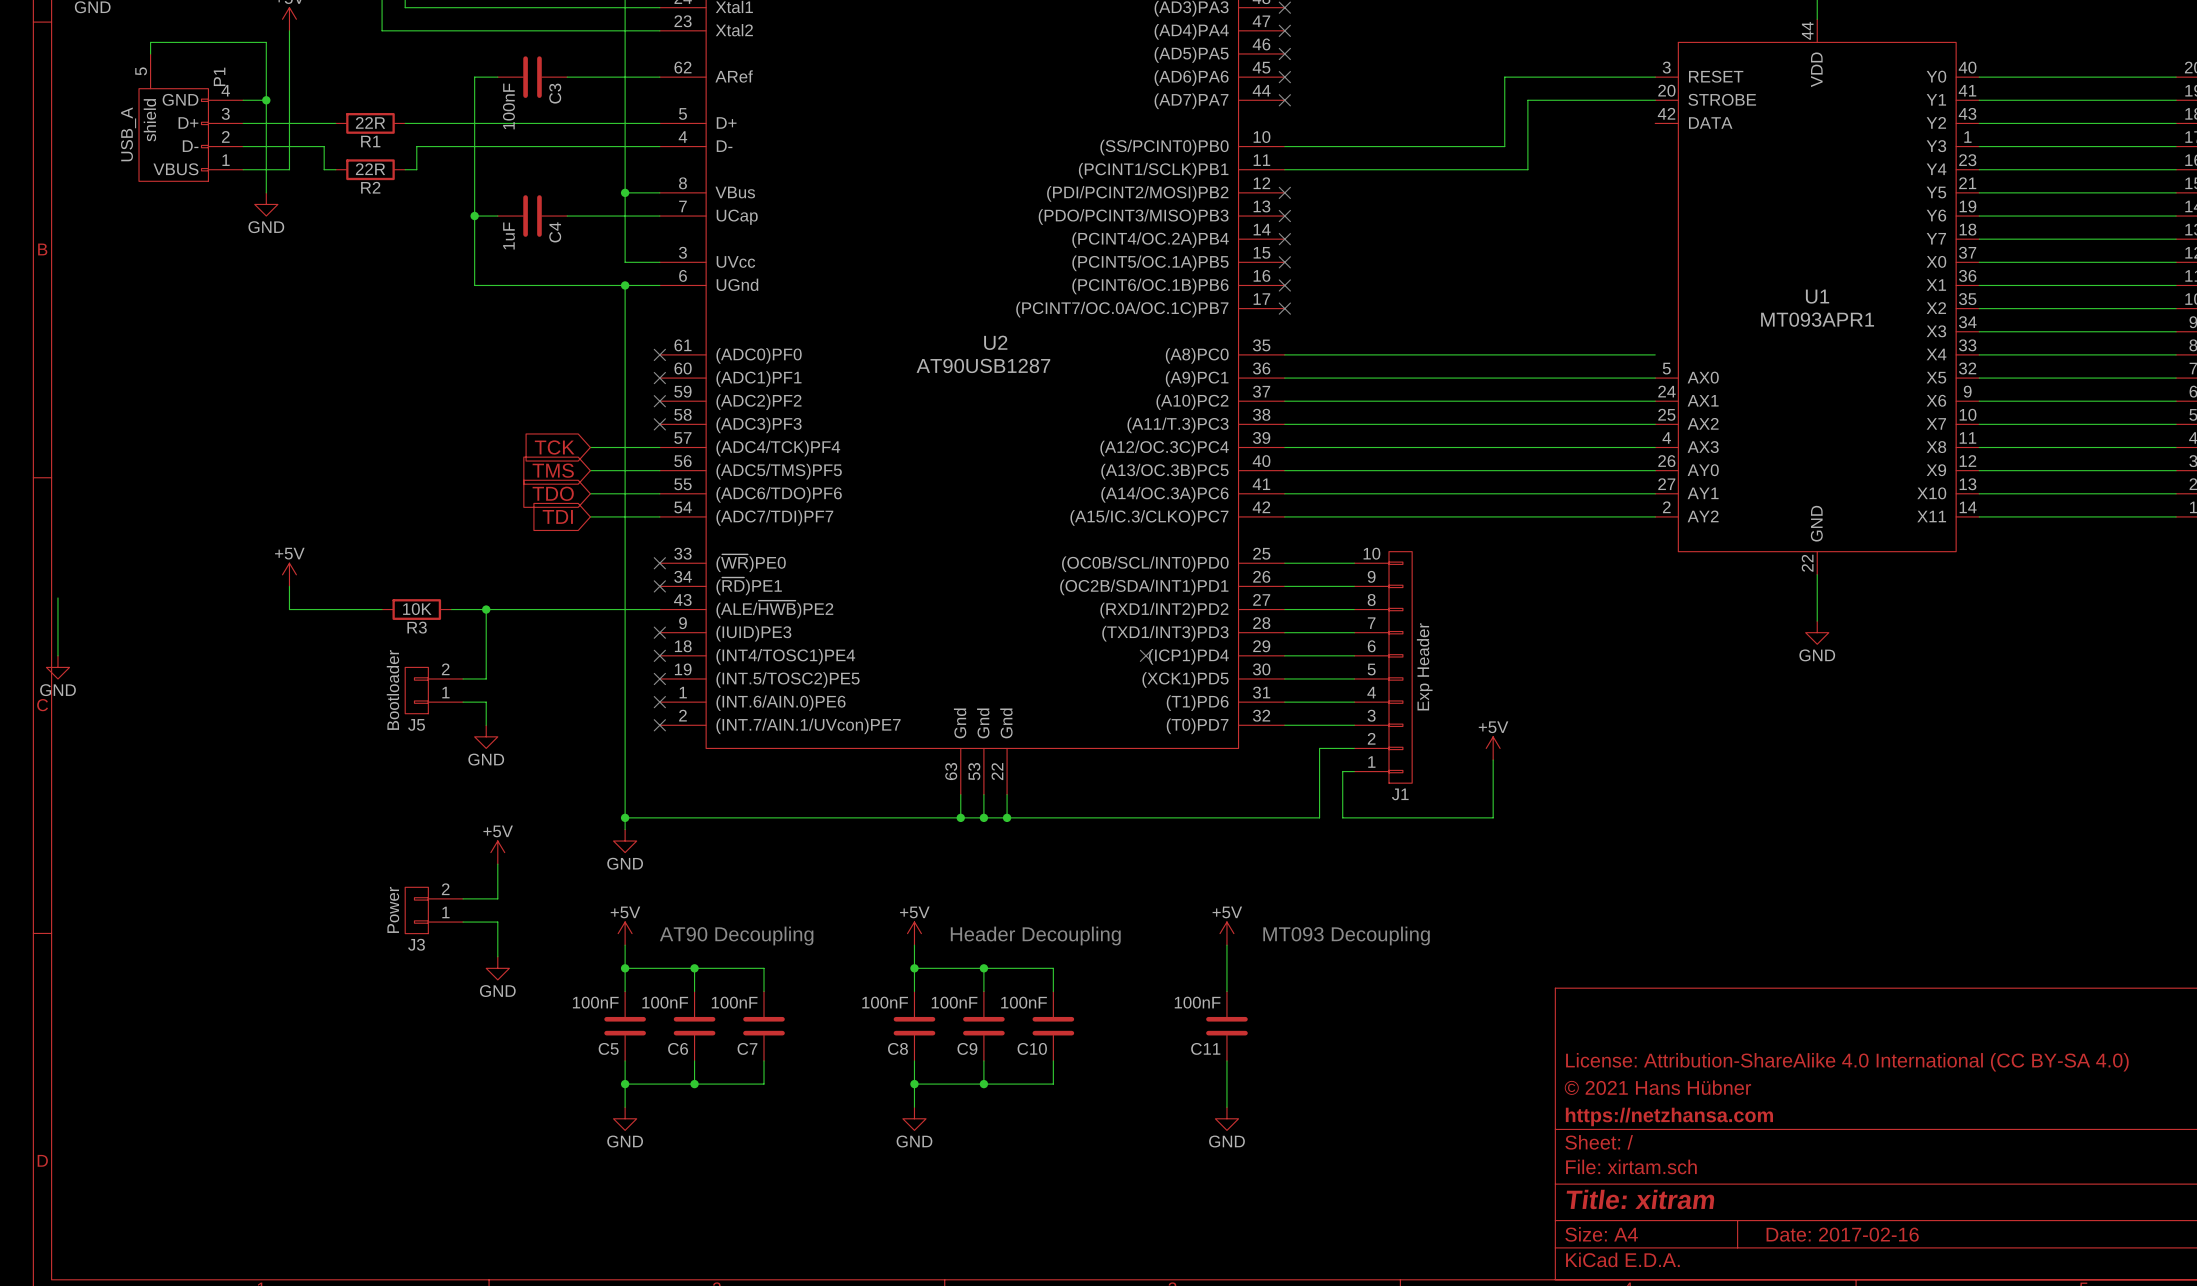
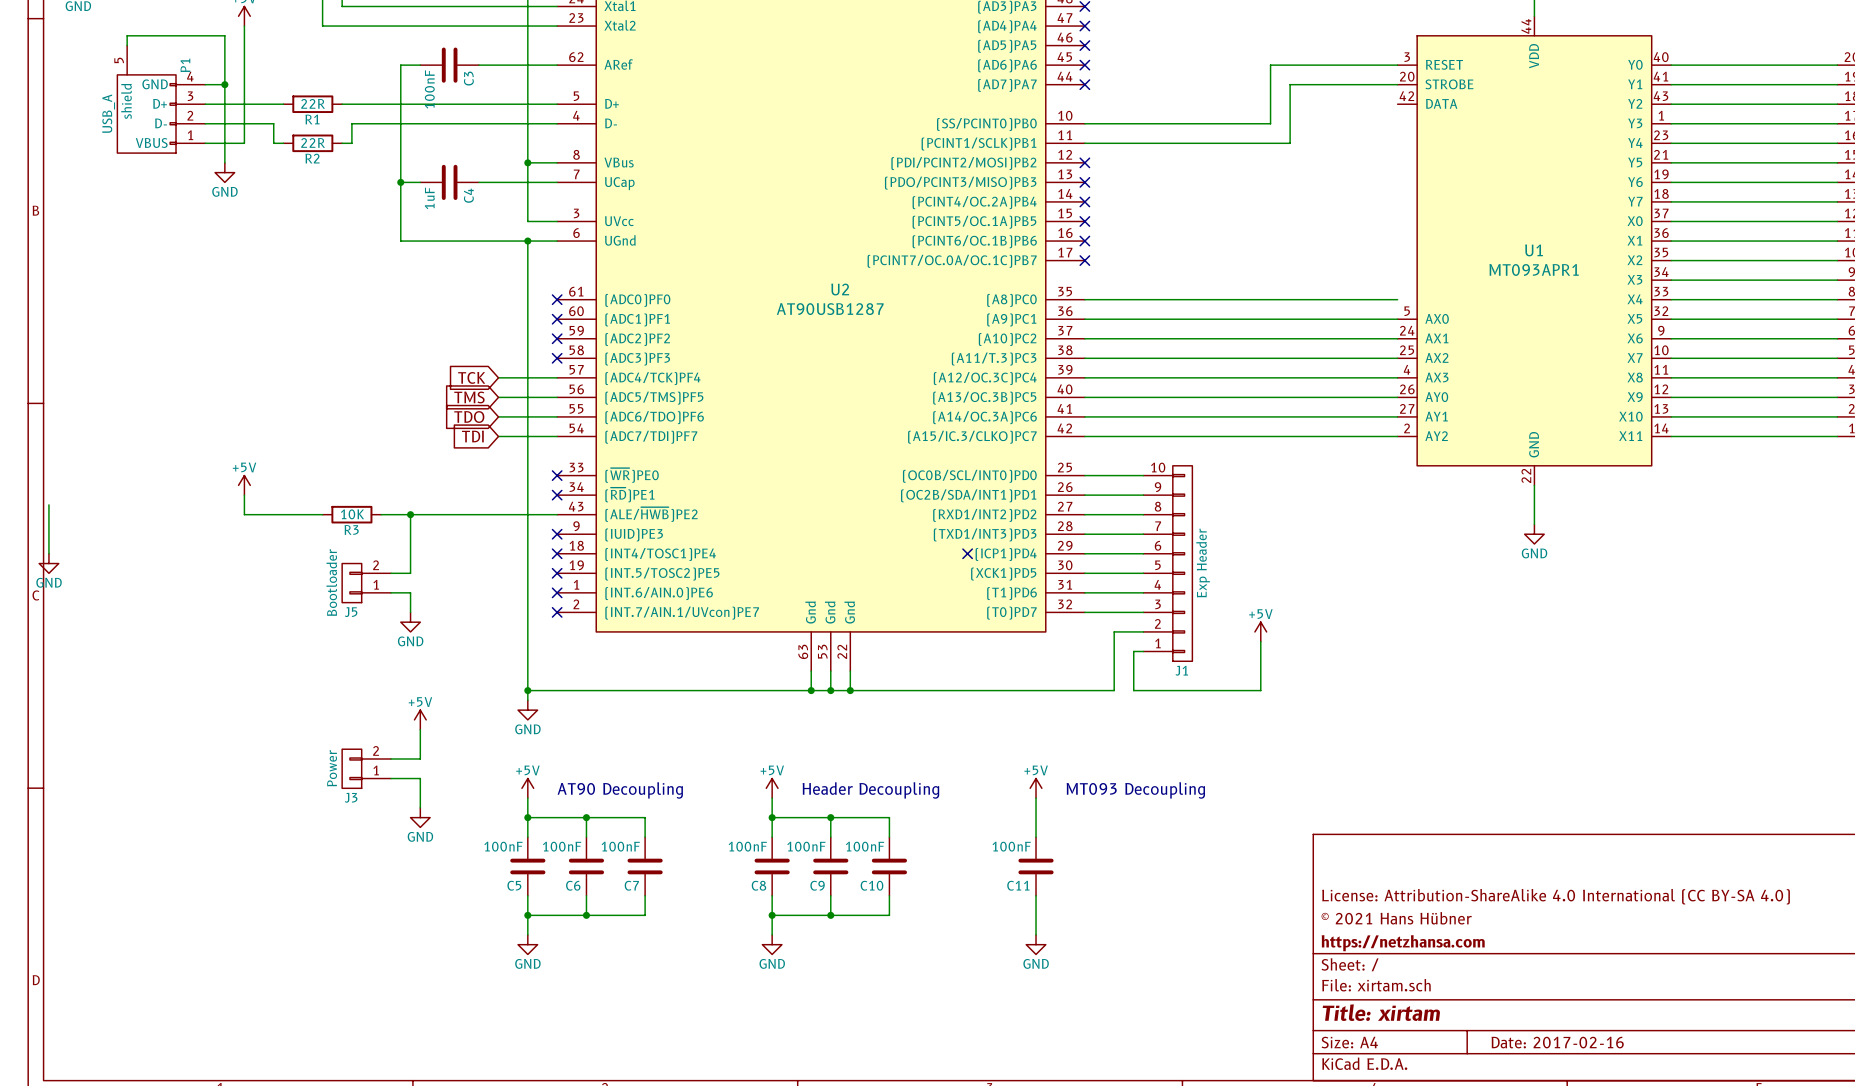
title block: Title: xitram (1640, 1199) -> Title: xirtam (1381, 1012)

